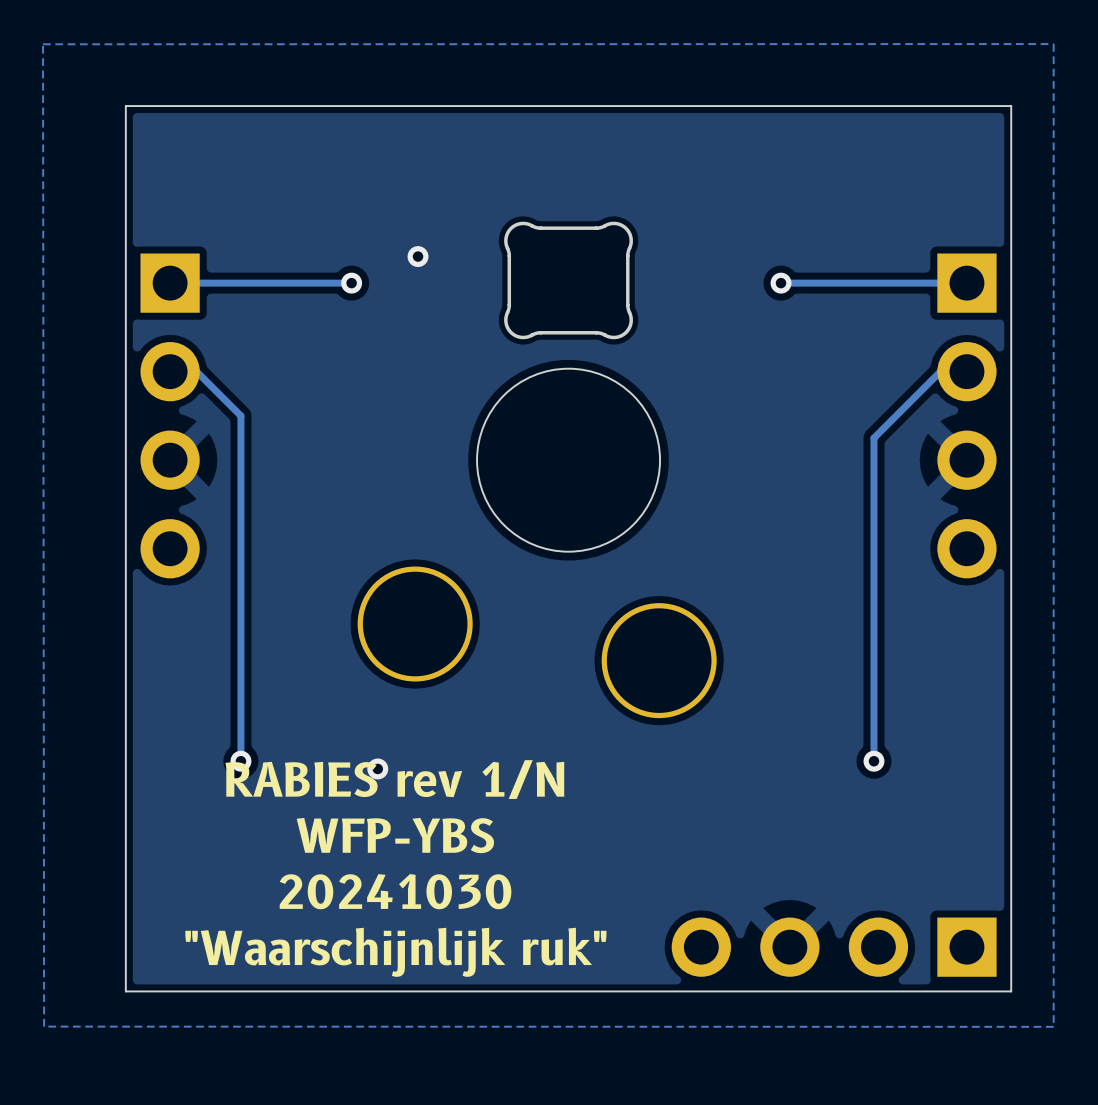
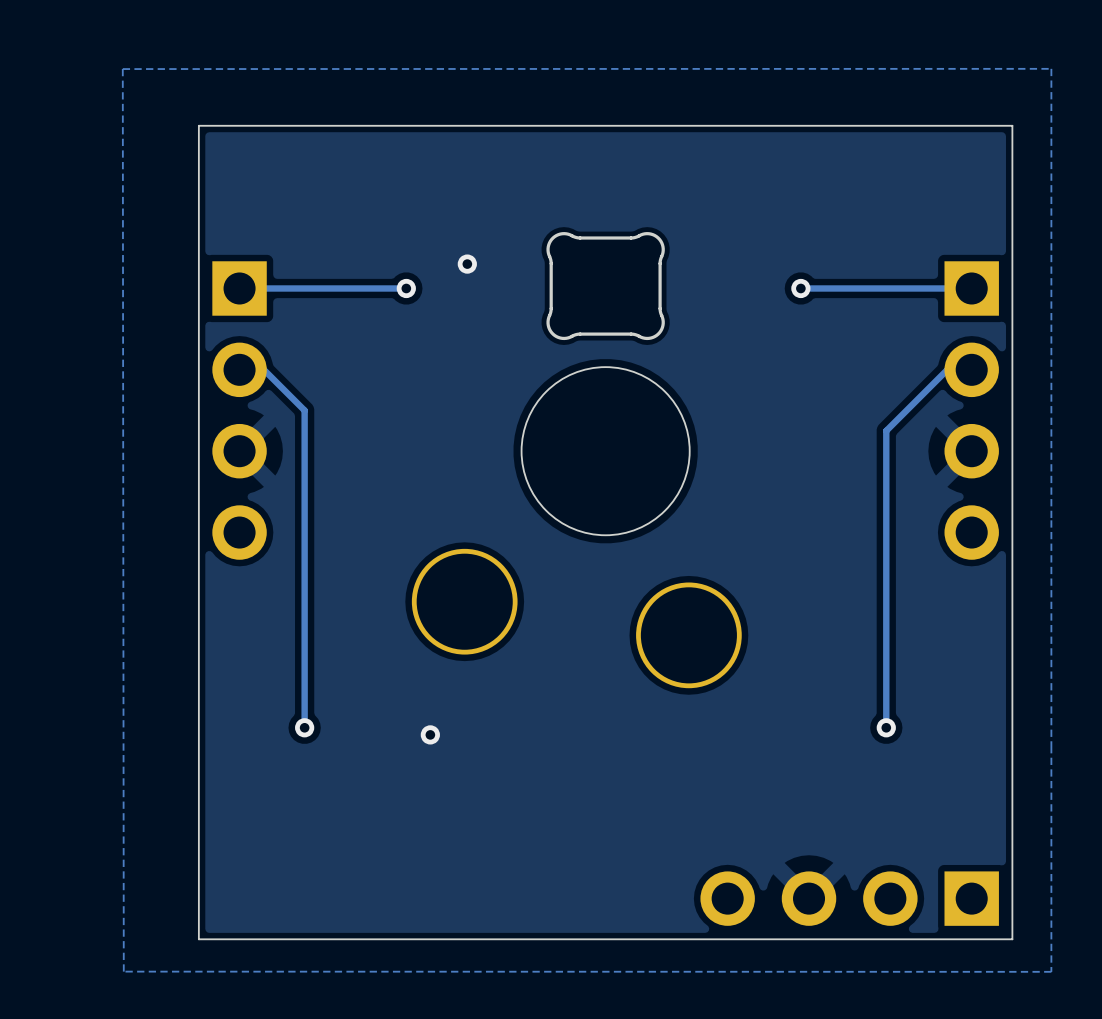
text: RABIES rev 1/N (394, 779) -> none
text: WFP-YBS (395, 835) -> none
text: 20241030 (395, 891) -> none
text: "Waarschijnlijk ruk" (395, 952) -> none

